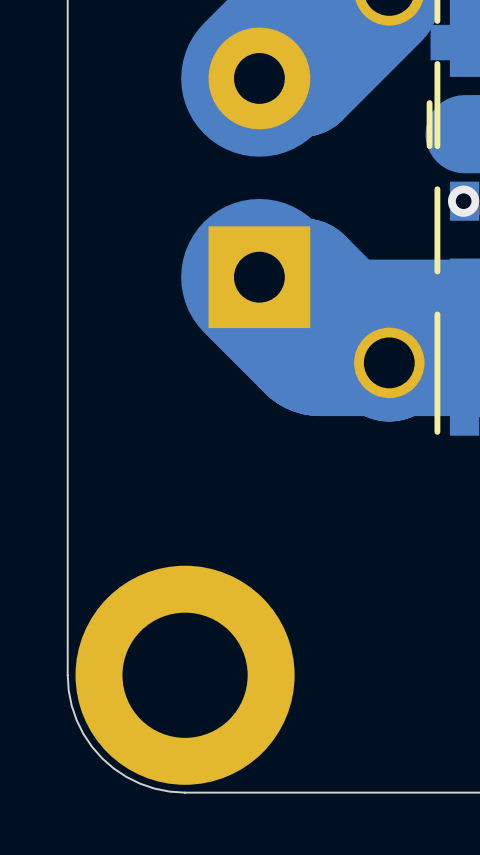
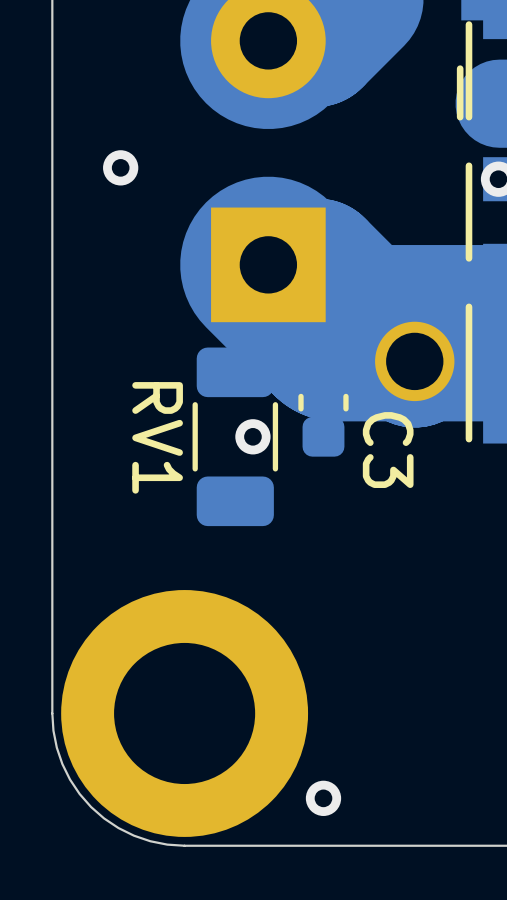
via: none -> (120, 167)
C3: none -> (323, 402)
RV1: none -> (235, 436)
via: none -> (252, 436)
via: none -> (323, 798)

